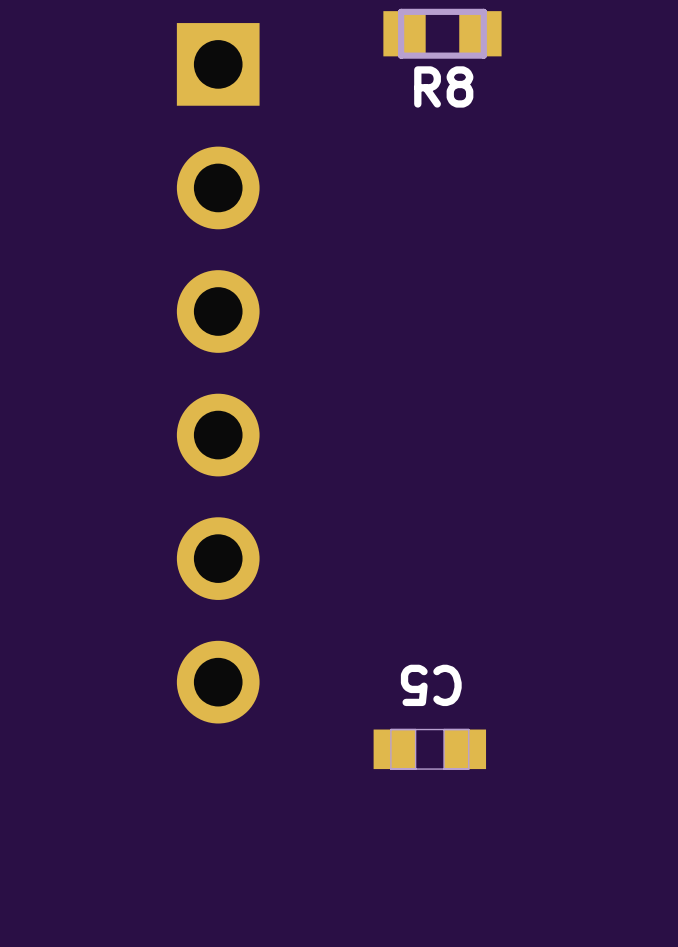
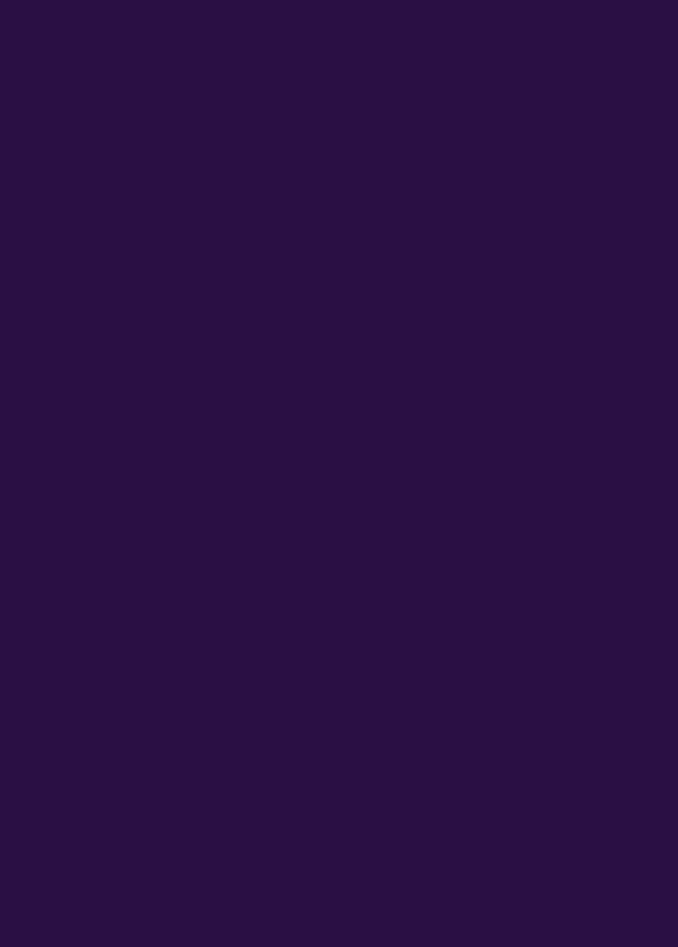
R8: (442, 33) -> none
part: (218, 373) -> none
C5: (429, 749) -> none

